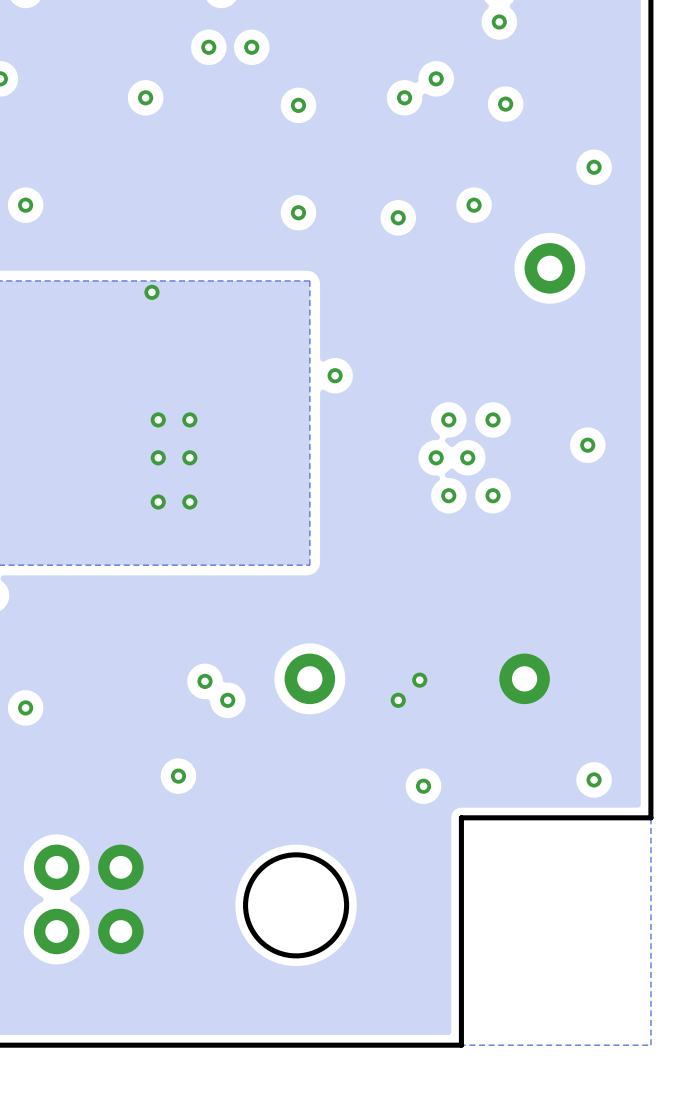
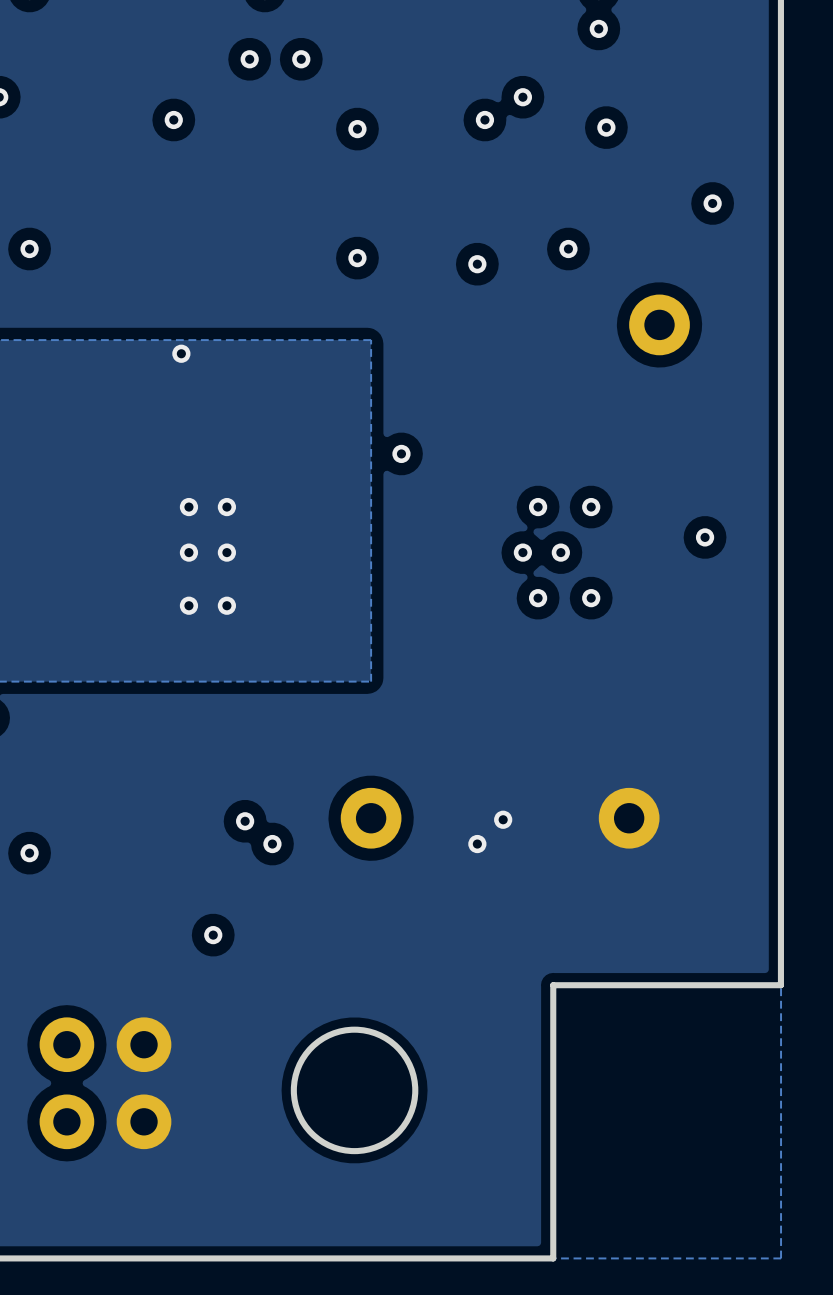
via: (594, 779) -> none
via: (423, 786) -> none

